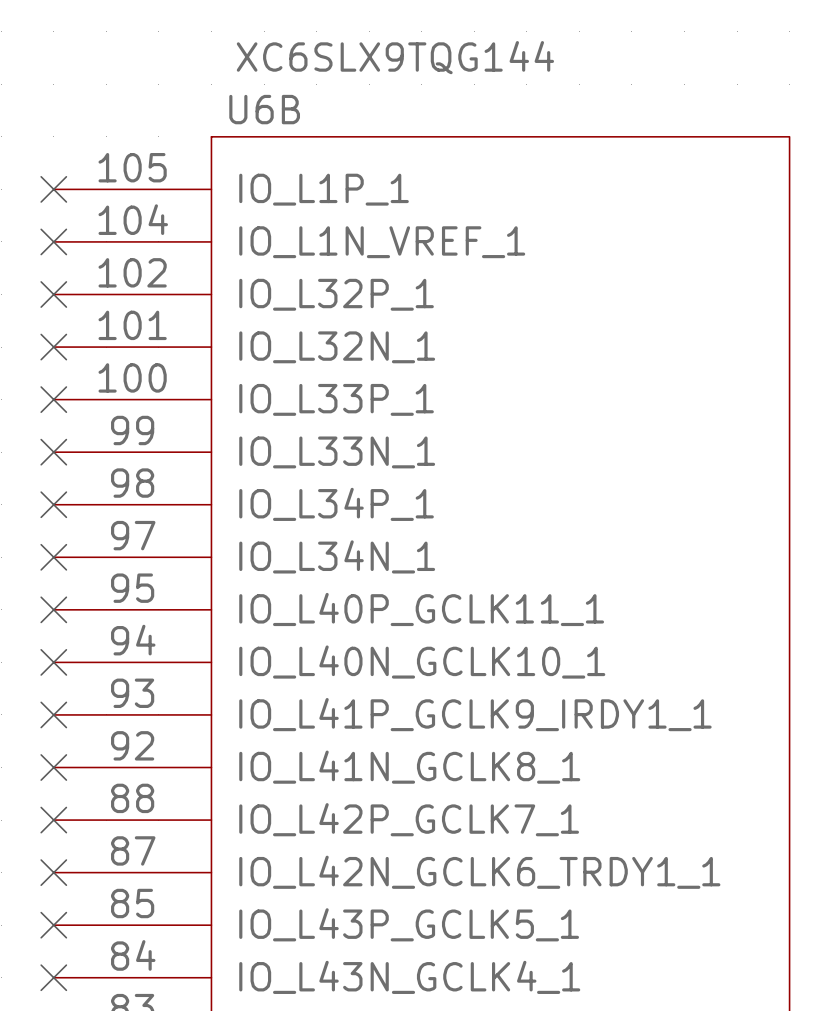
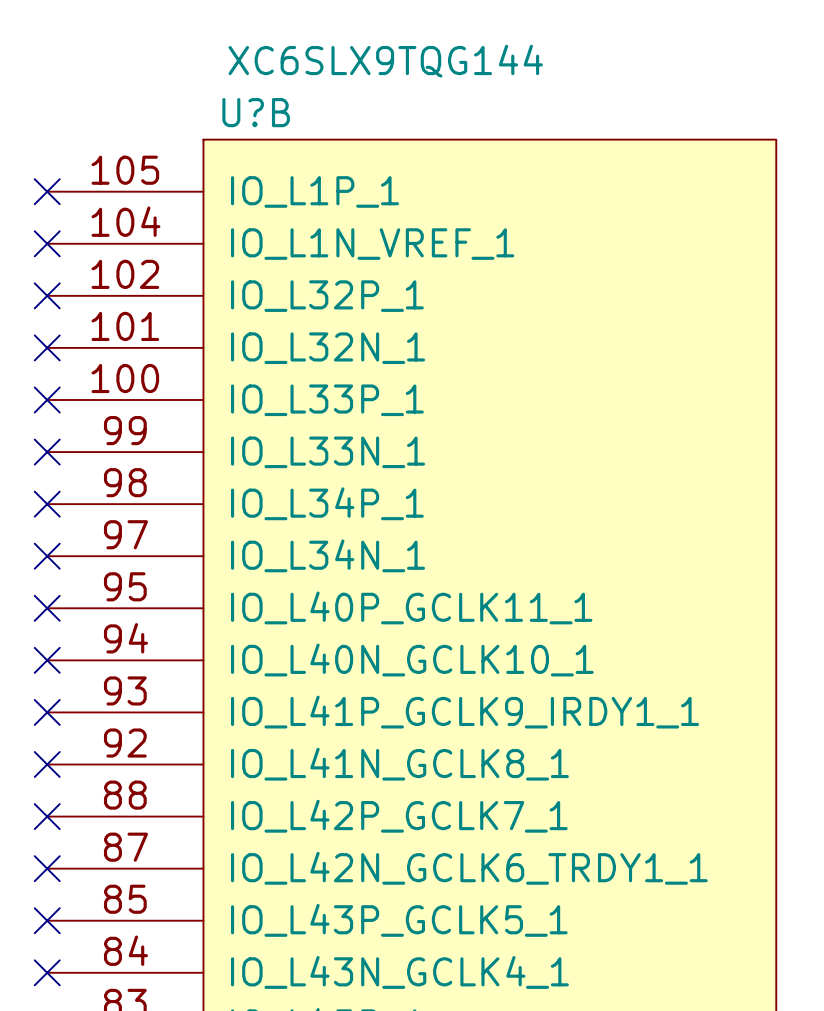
U6B name: U6B (264, 109) -> U?B (256, 112)

